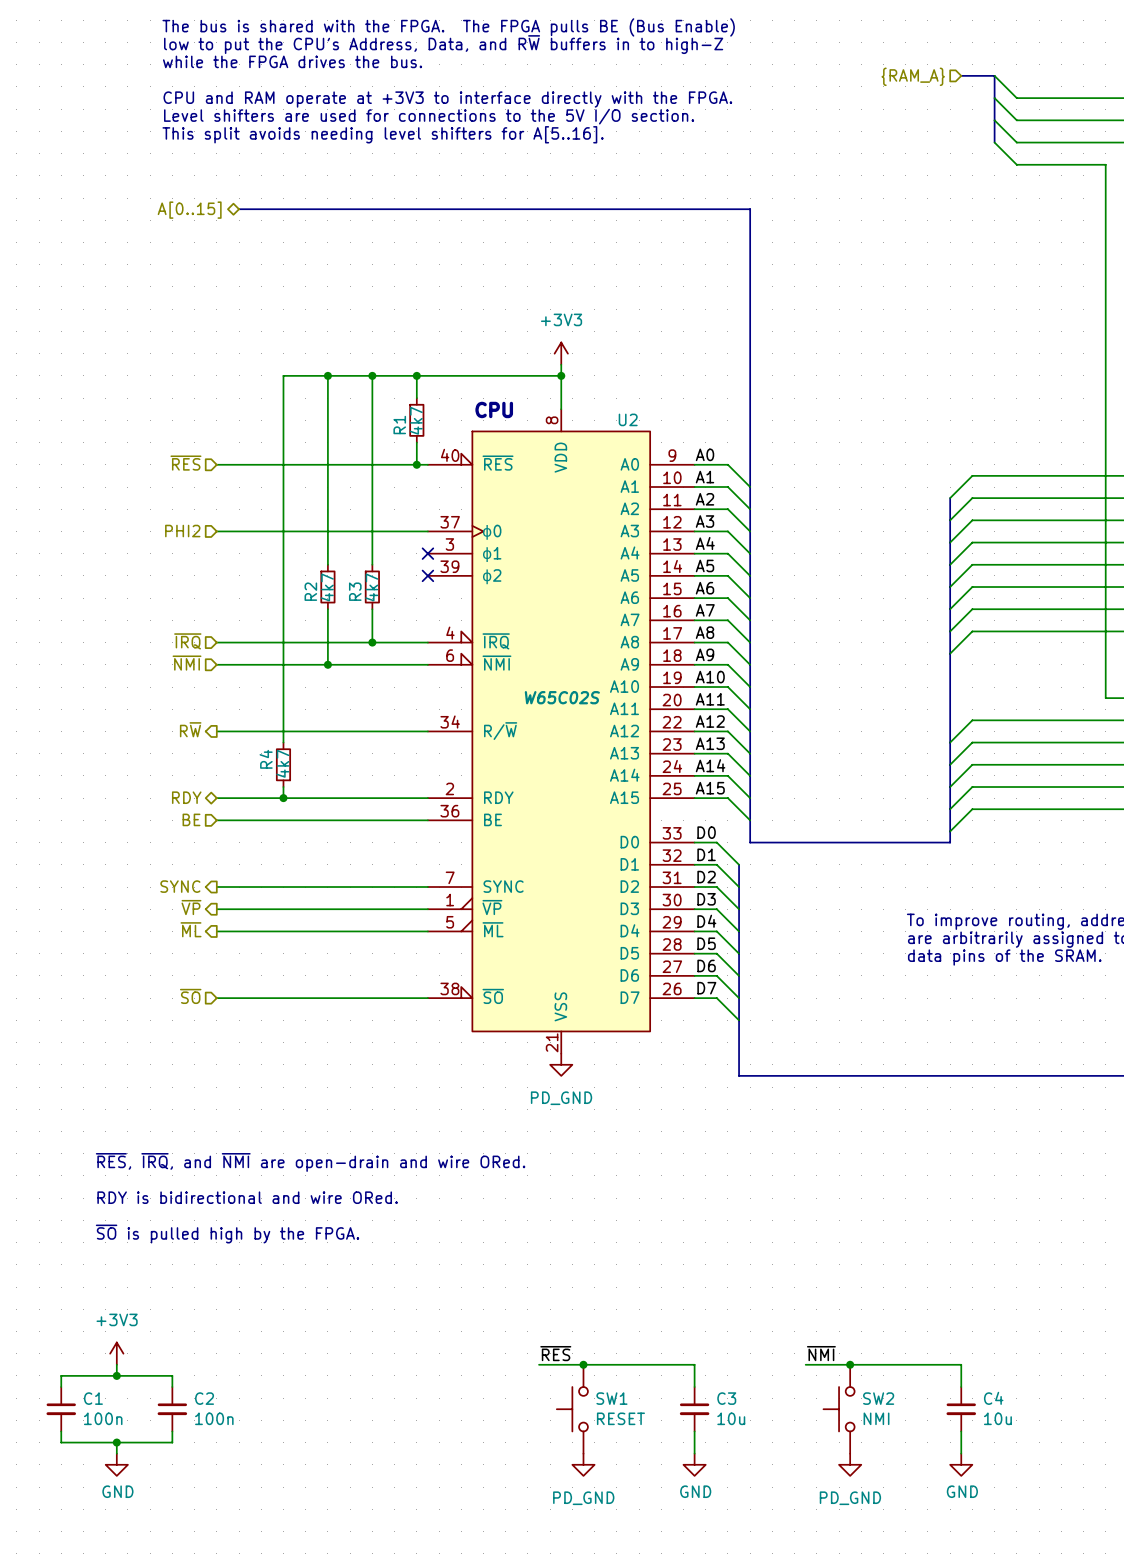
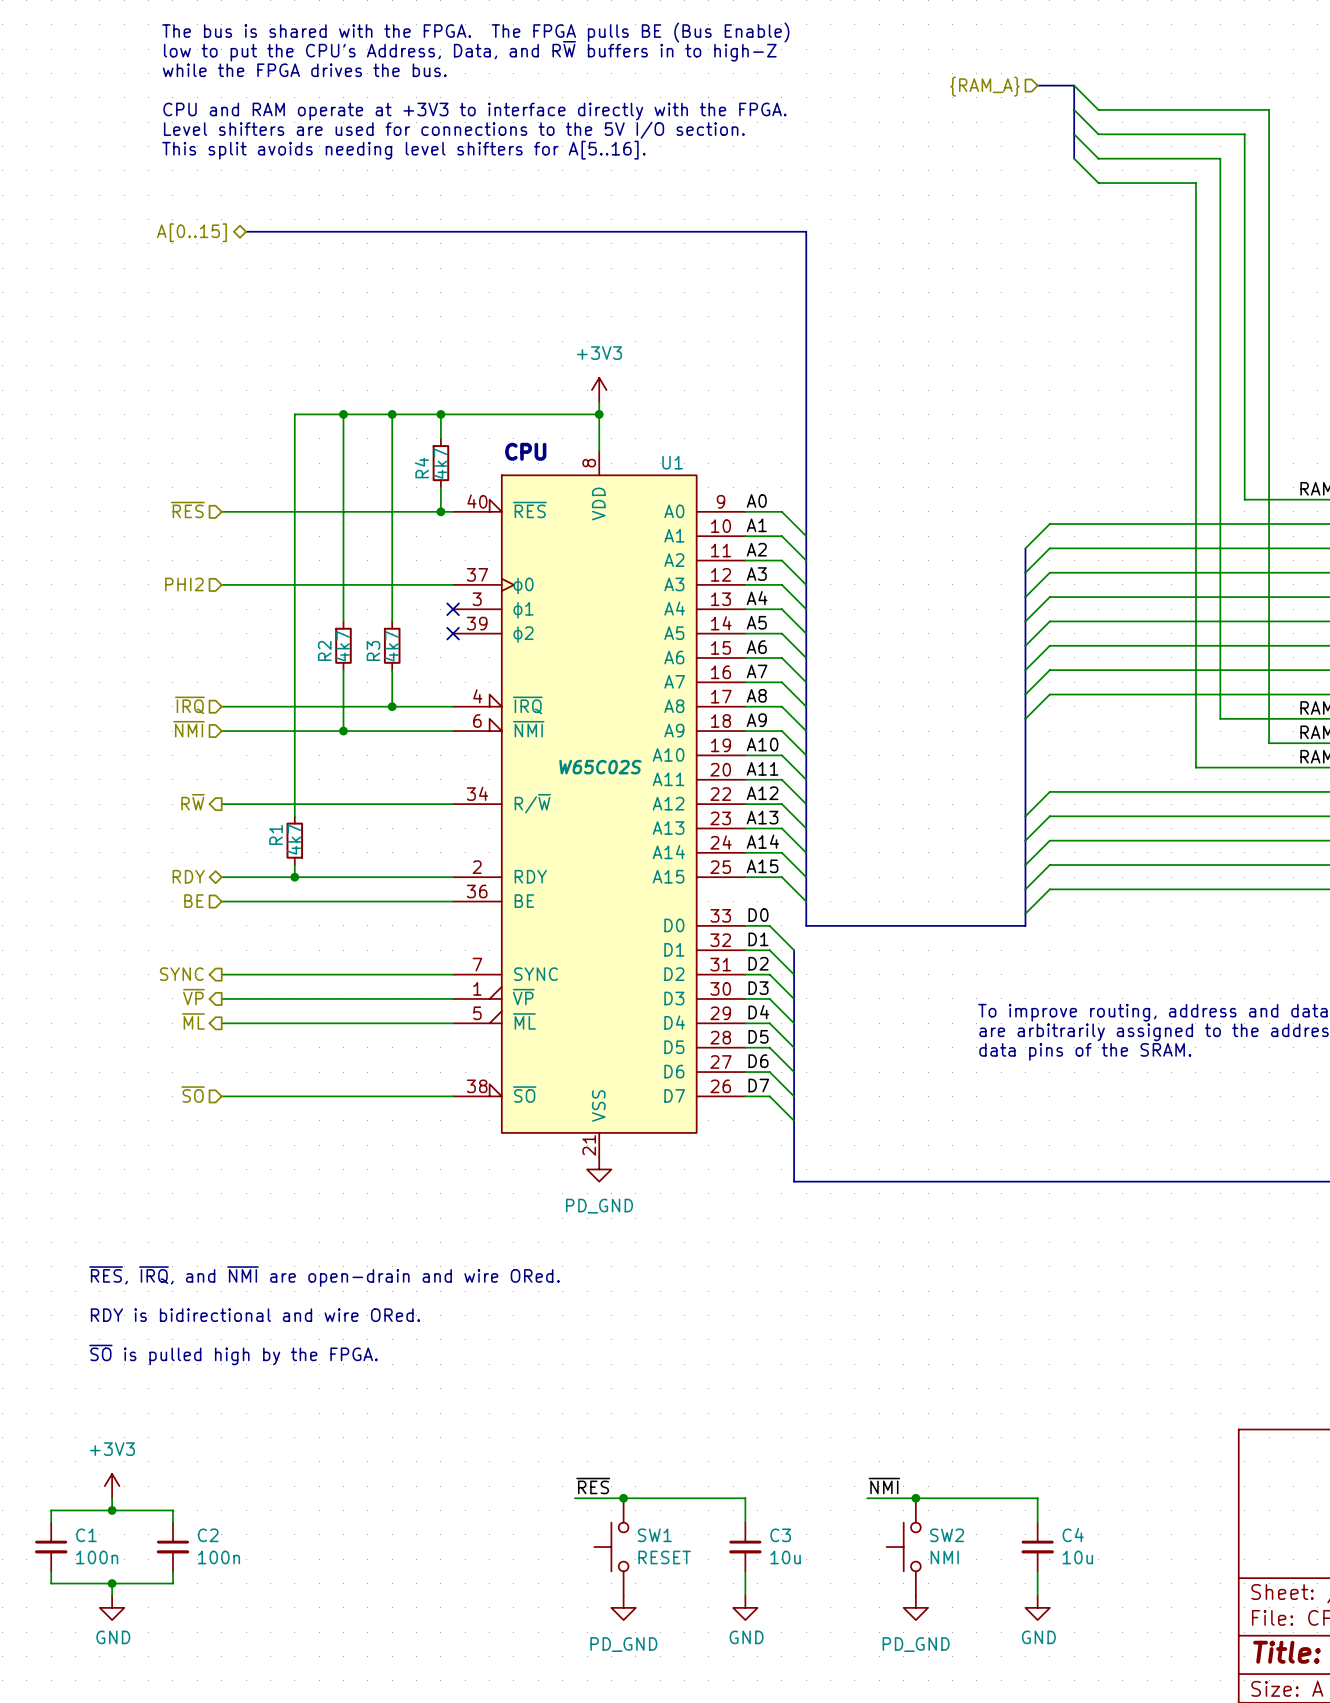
U2 name: U2 (628, 419) -> U1 (672, 462)
R1 name: R1 (399, 425) -> R4 (421, 467)
R4 name: R4 (266, 759) -> R1 (276, 834)

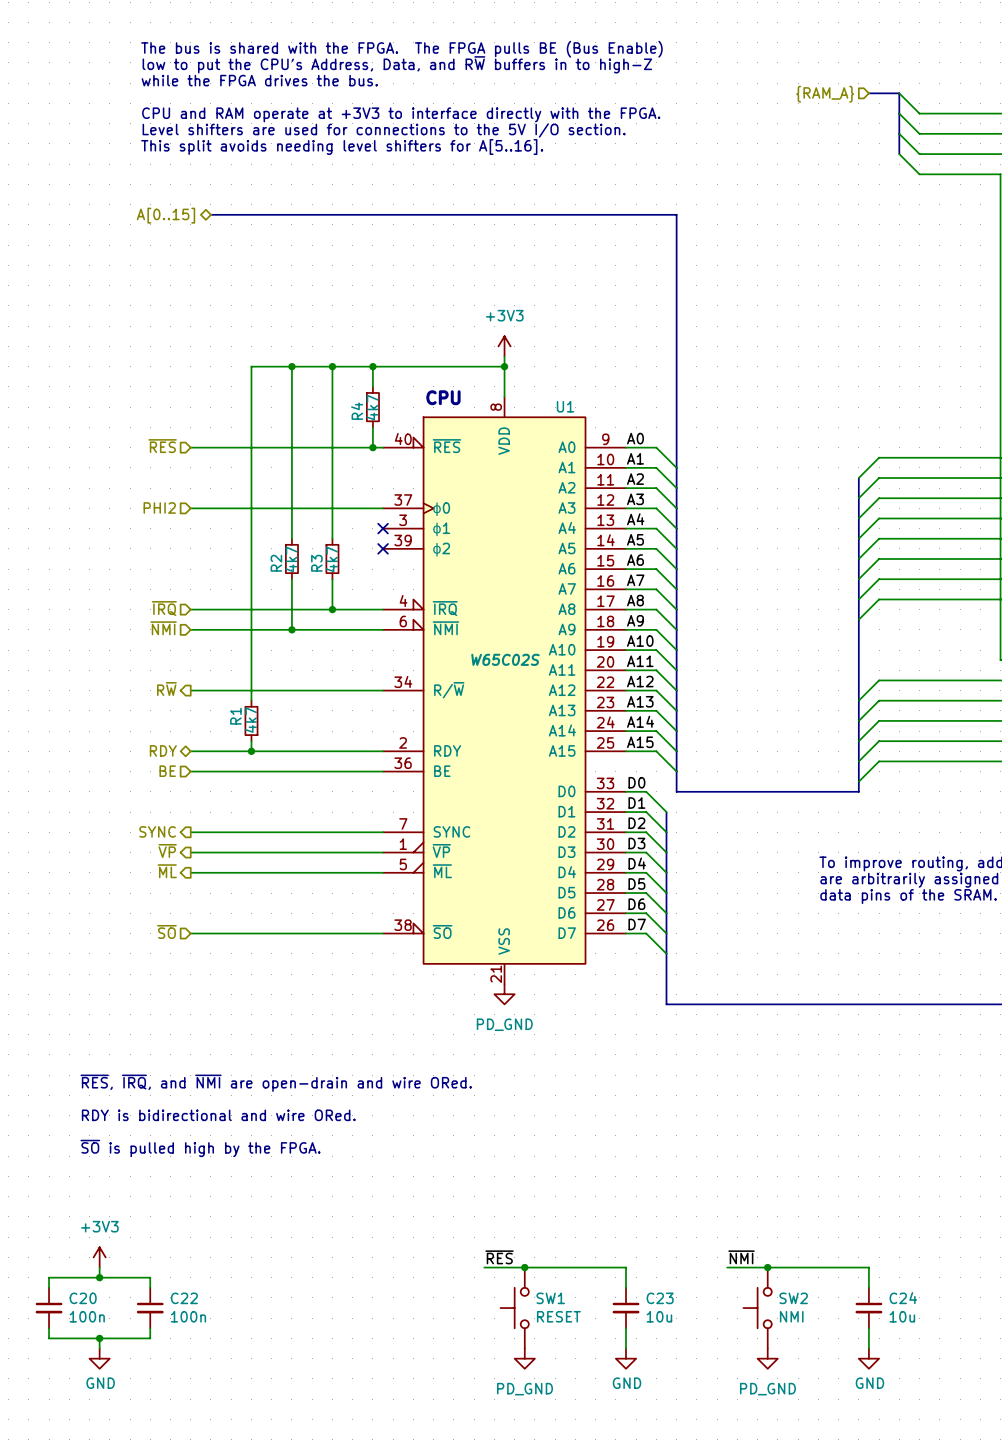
C1 name: C1 (86, 1535) -> C20 (83, 1298)
C2 name: C2 (208, 1535) -> C22 (184, 1298)
C3 name: C3 (780, 1535) -> C23 (660, 1298)
C4 name: C4 (1073, 1535) -> C24 (903, 1298)

